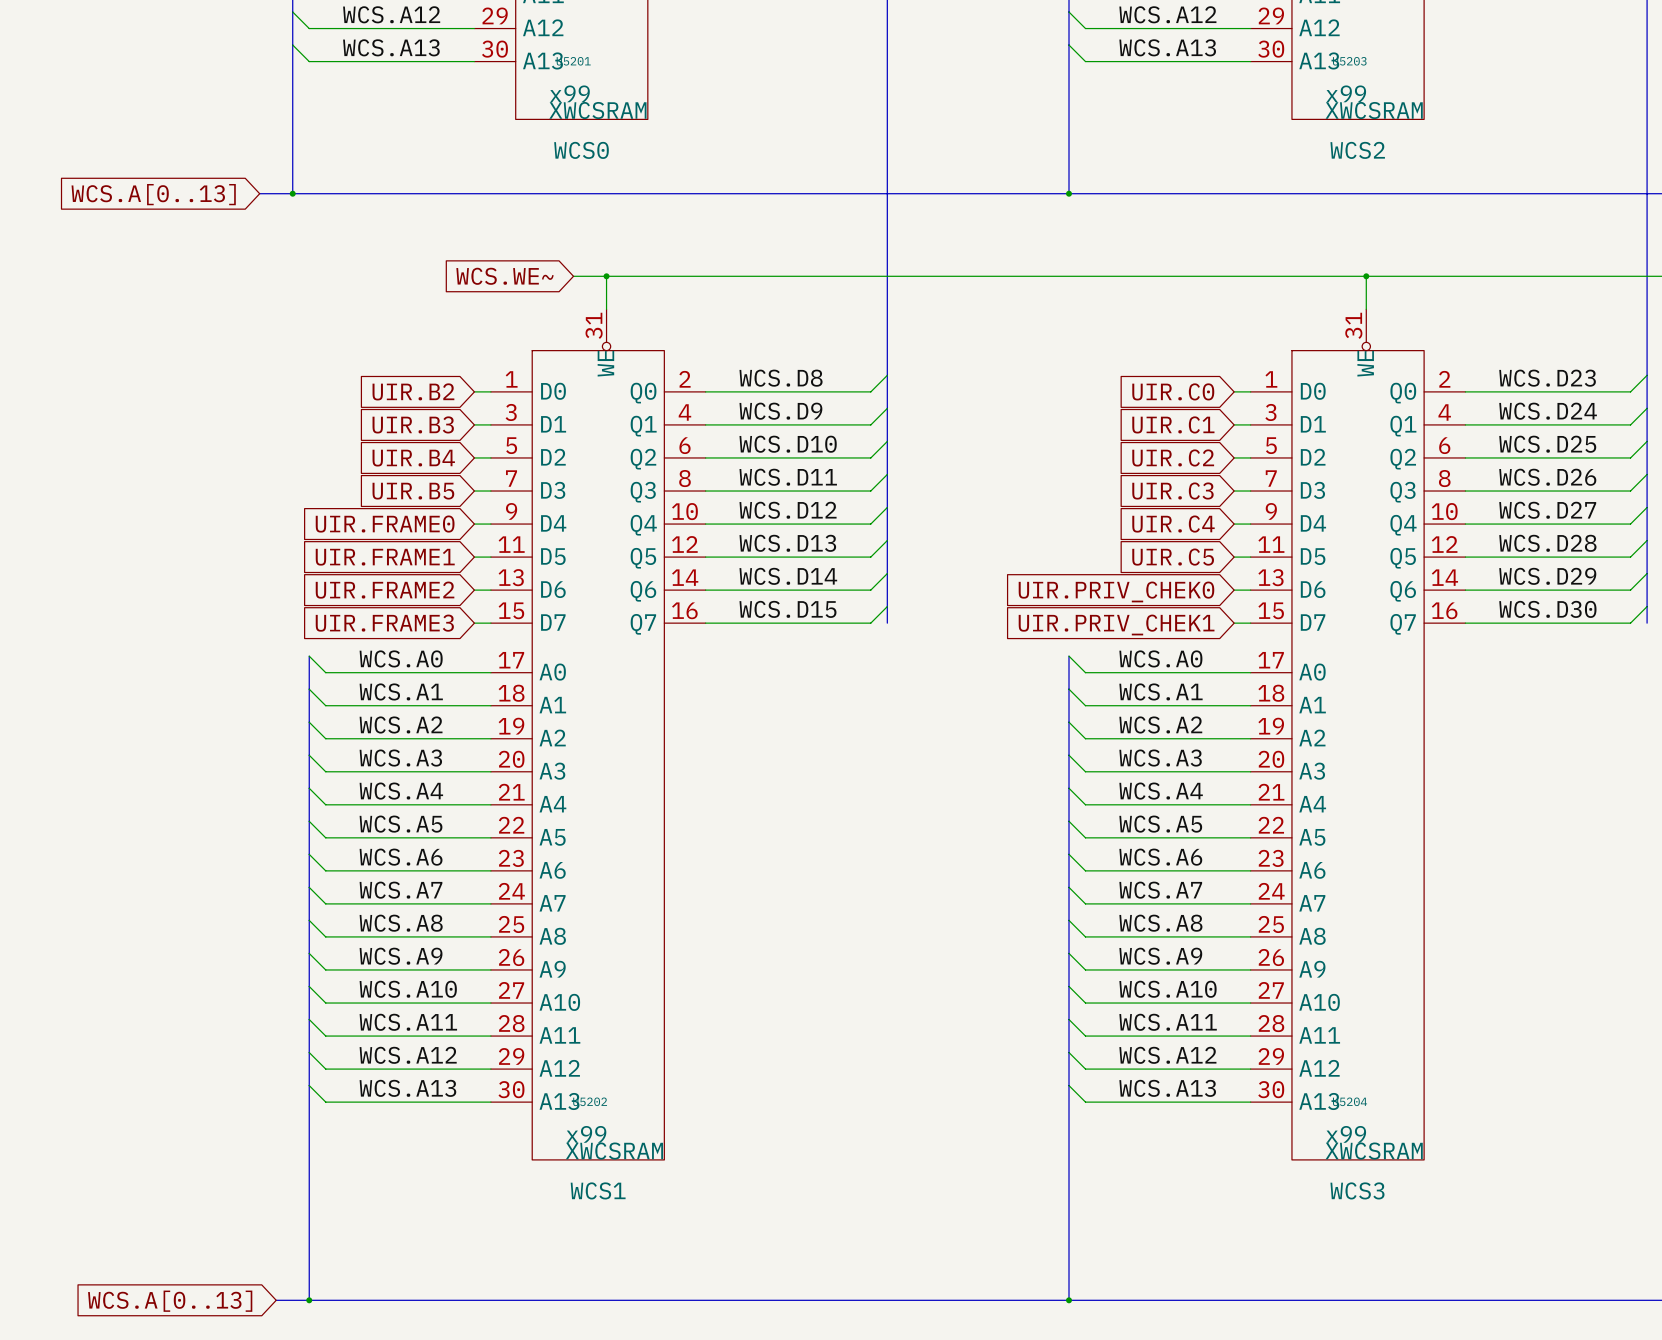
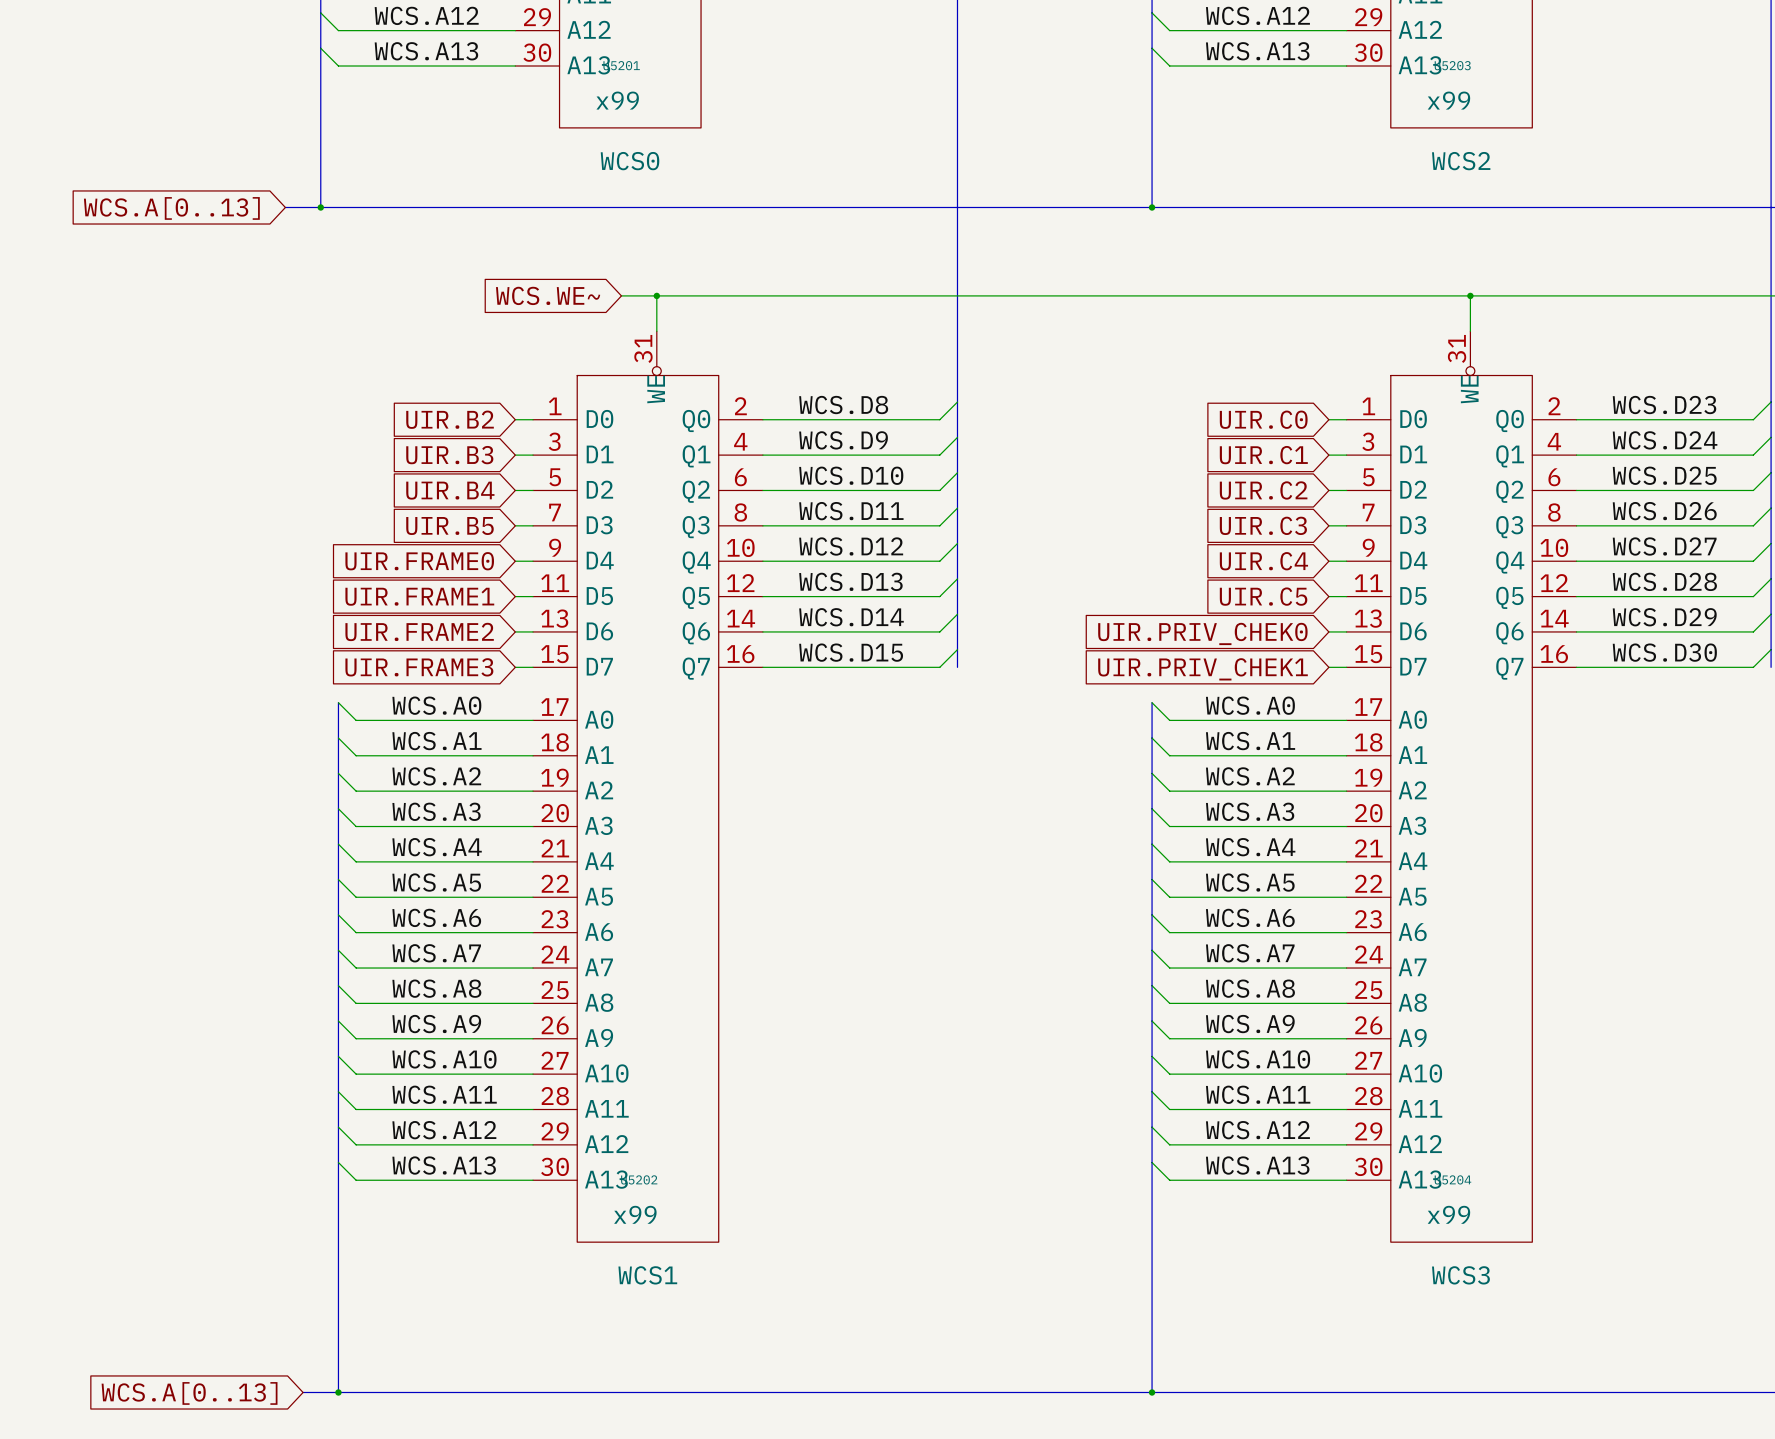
U5201 value: XWCSRAM (597, 110) -> none
U5203 value: XWCSRAM (1374, 110) -> none
U5202 value: XWCSRAM (614, 1151) -> none
U5204 value: XWCSRAM (1374, 1151) -> none

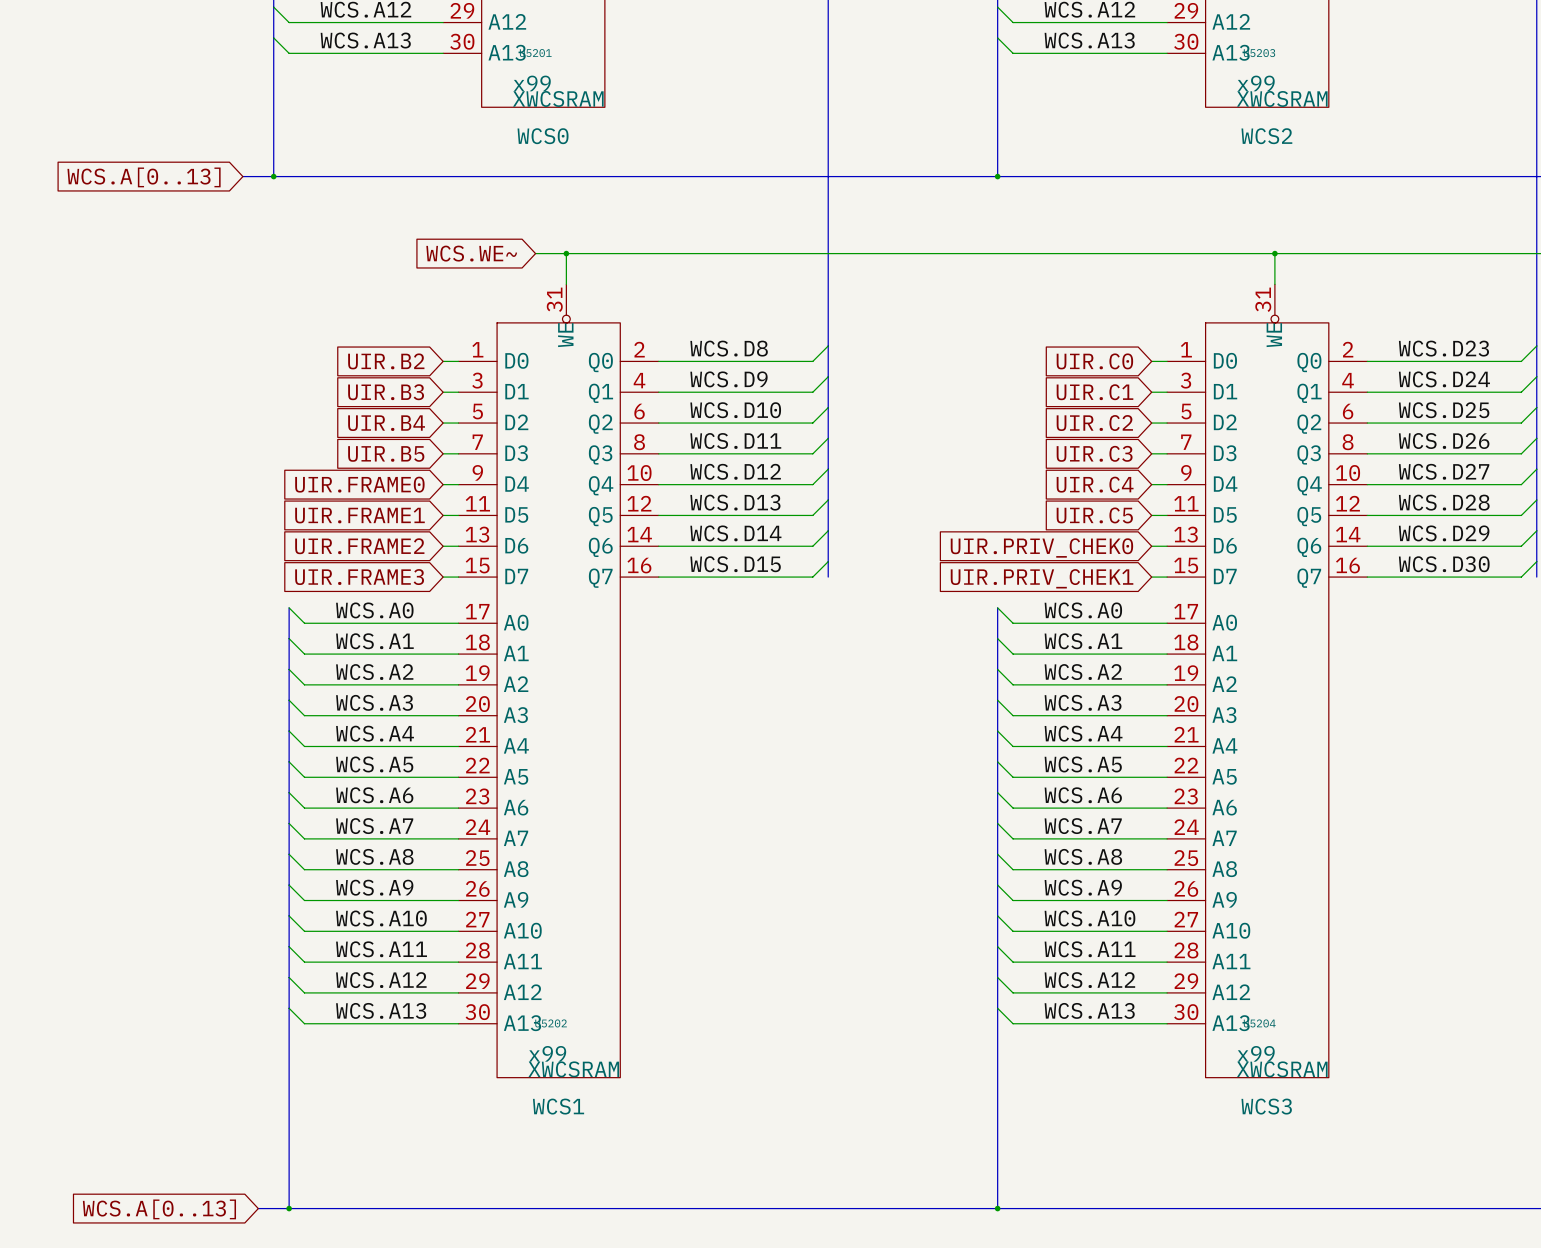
U5201 value: none -> XWCSRAM (558, 98)
U5203 value: none -> XWCSRAM (1282, 98)
U5202 value: none -> XWCSRAM (573, 1069)
U5204 value: none -> XWCSRAM (1282, 1069)

